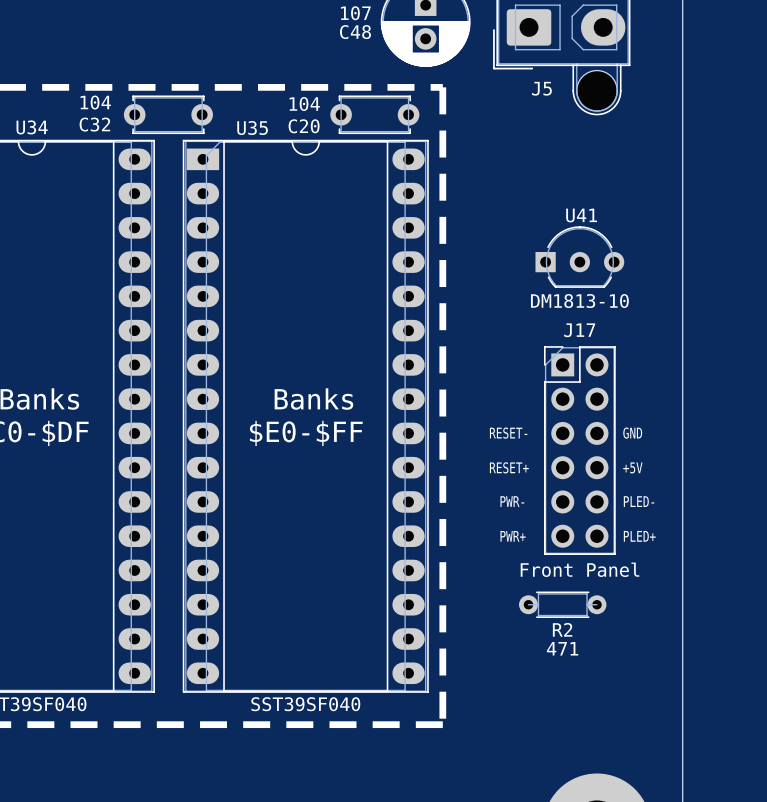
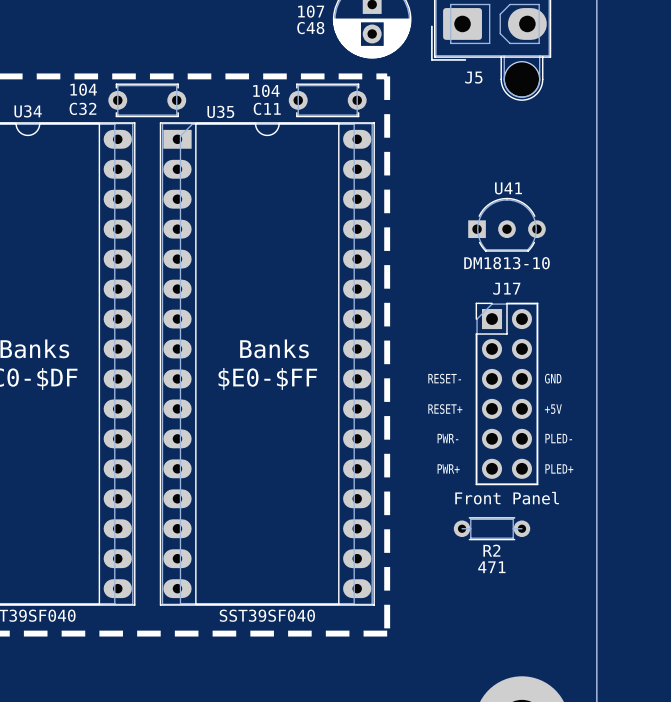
C20 name: C20 (304, 126) -> C11 (267, 108)

